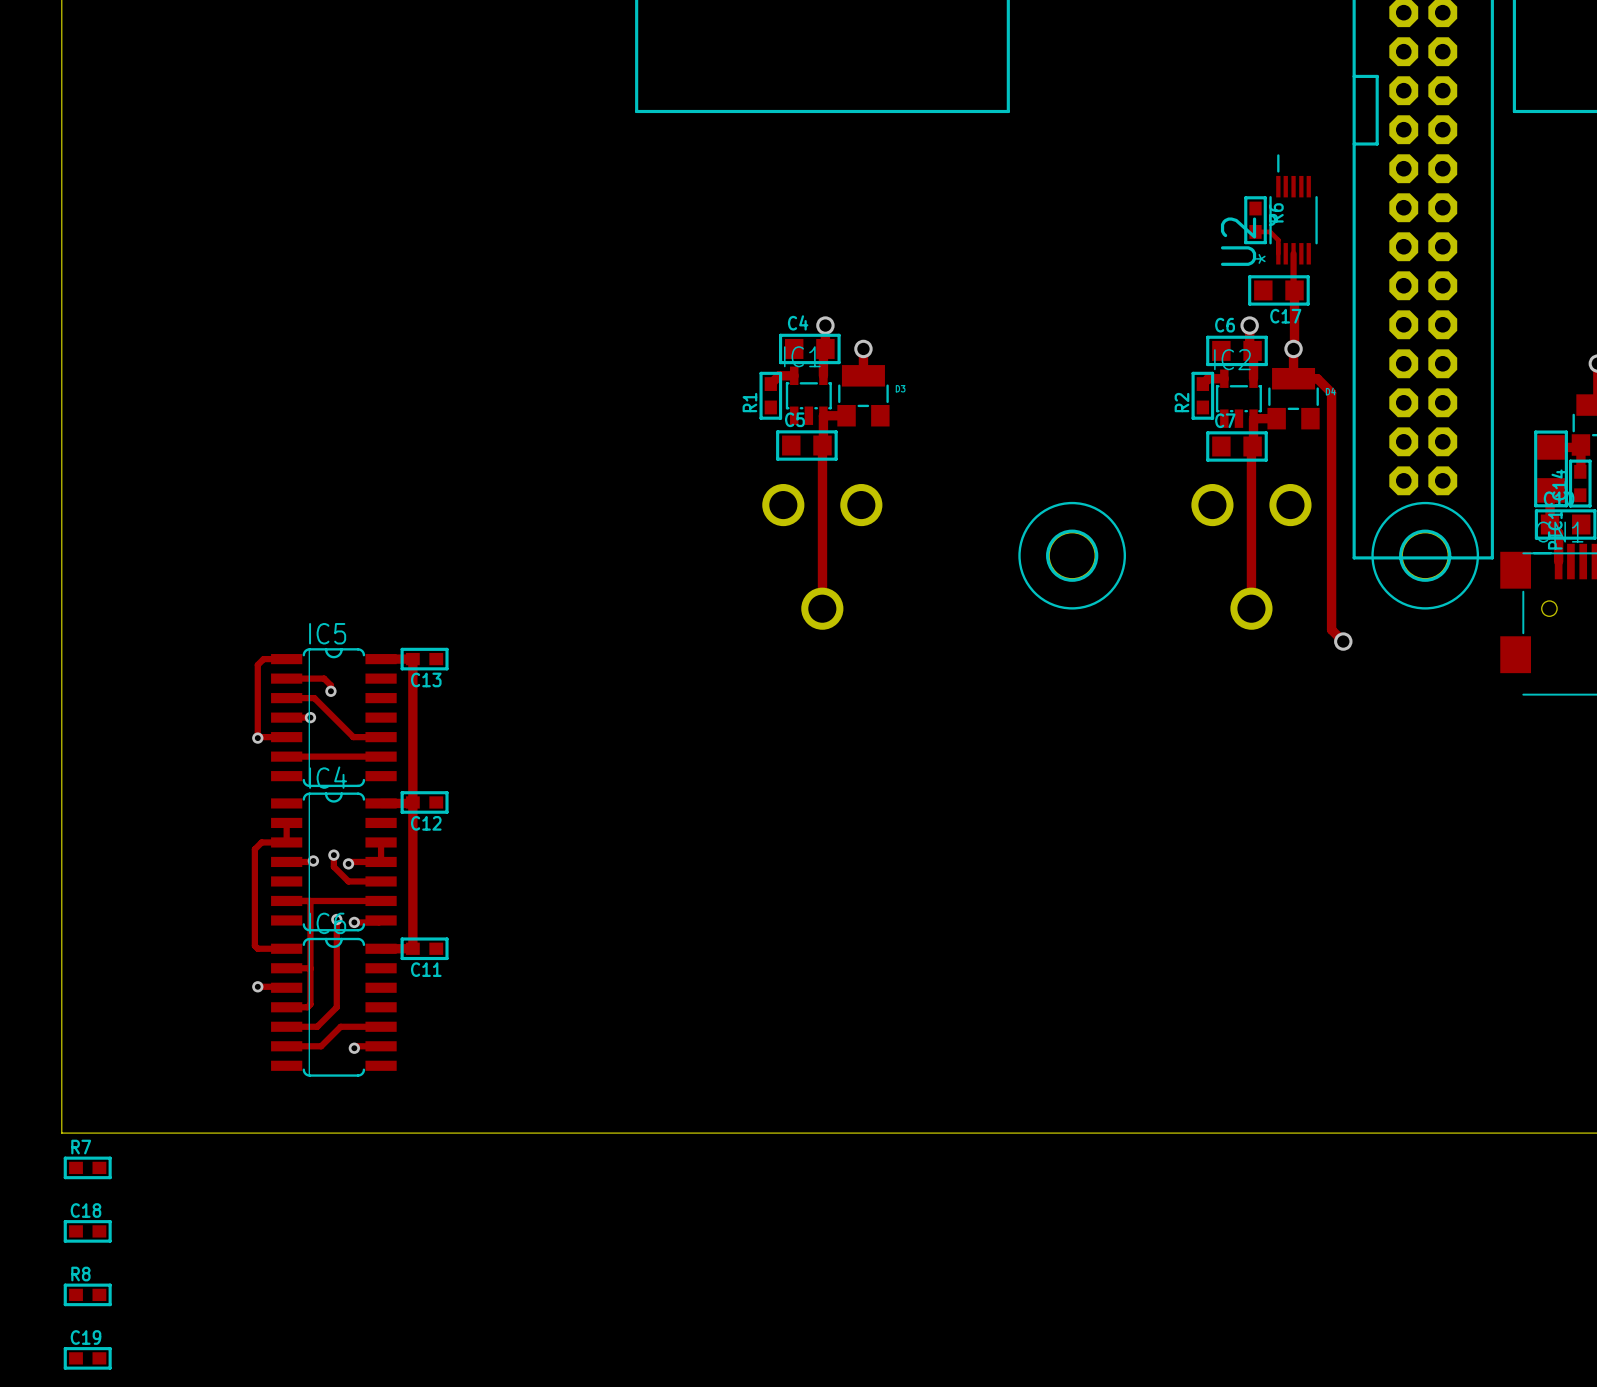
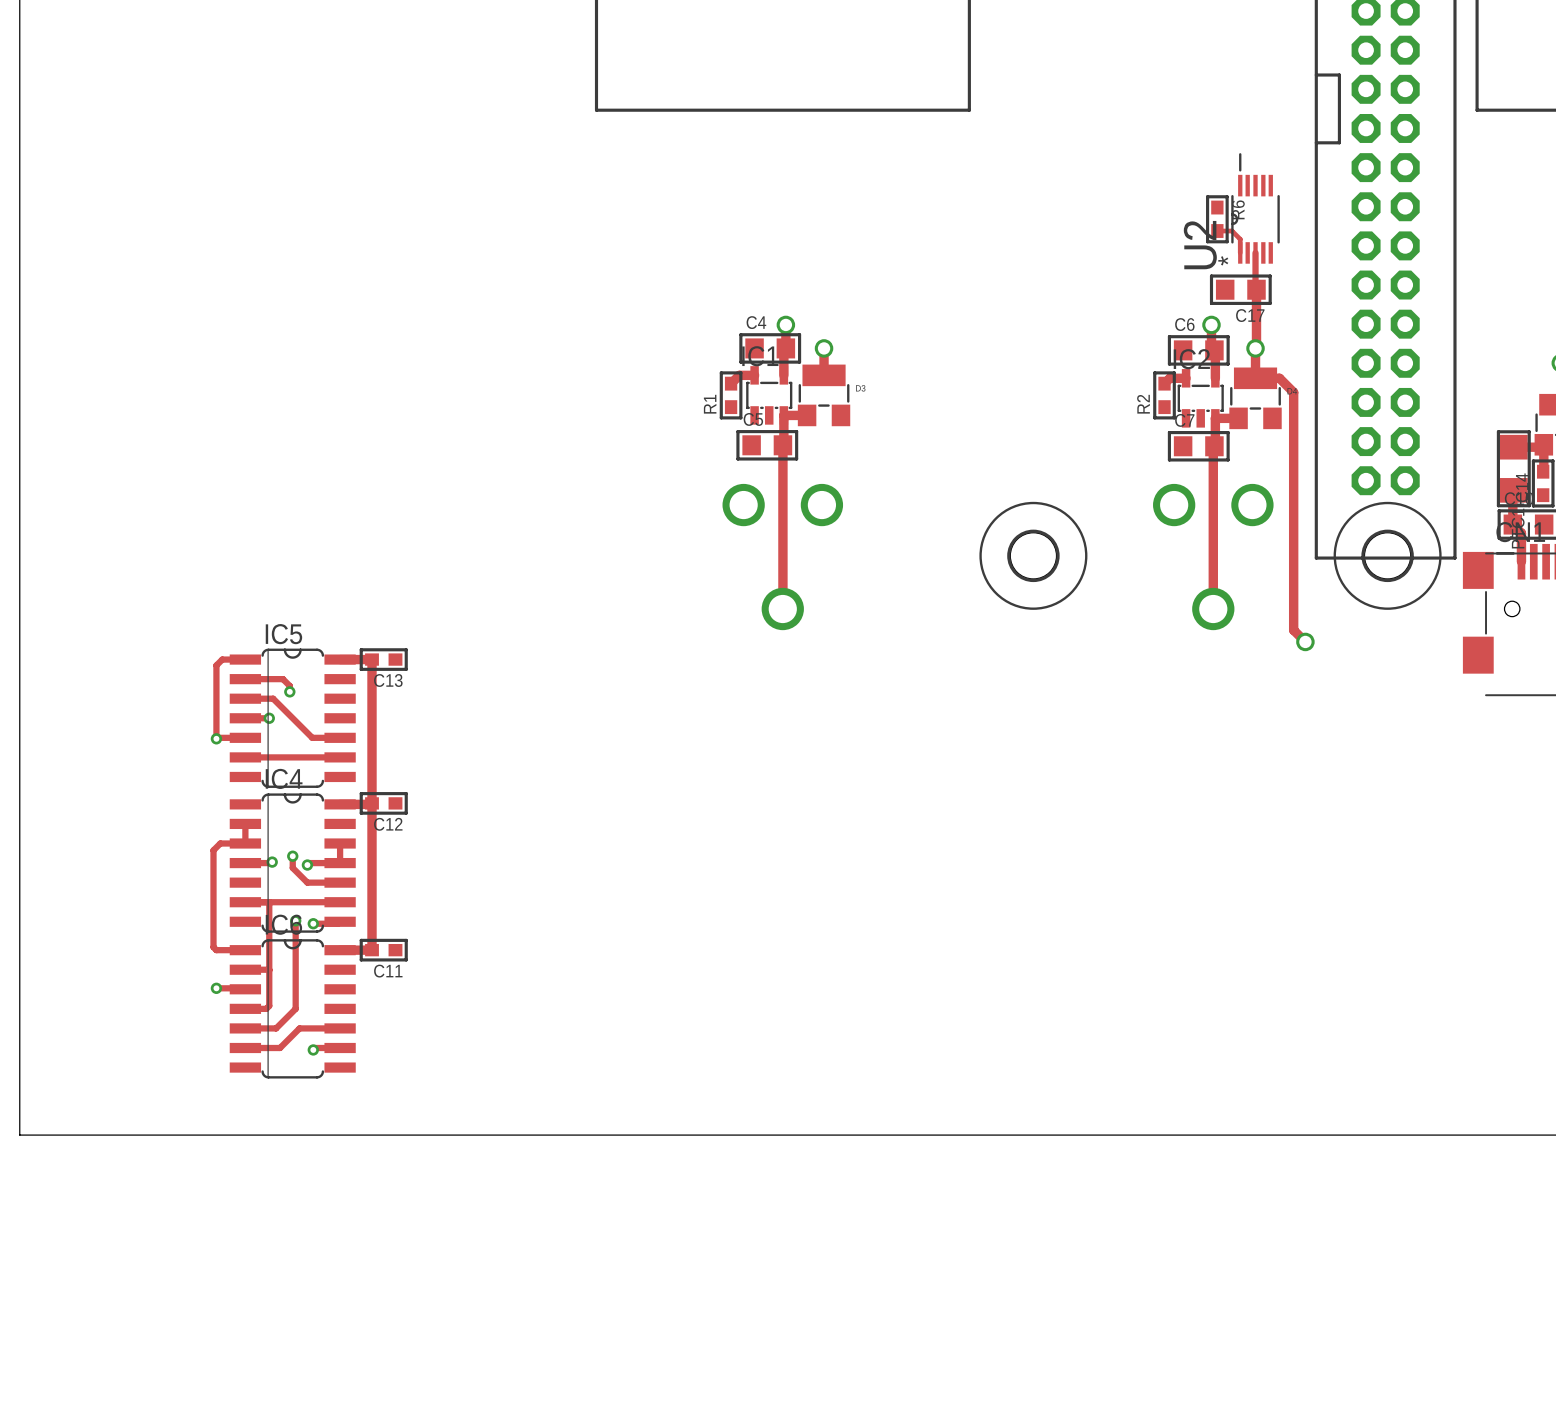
R7: (87, 1167) -> none
C18: (87, 1231) -> none
R8: (87, 1294) -> none
C19: (87, 1358) -> none

